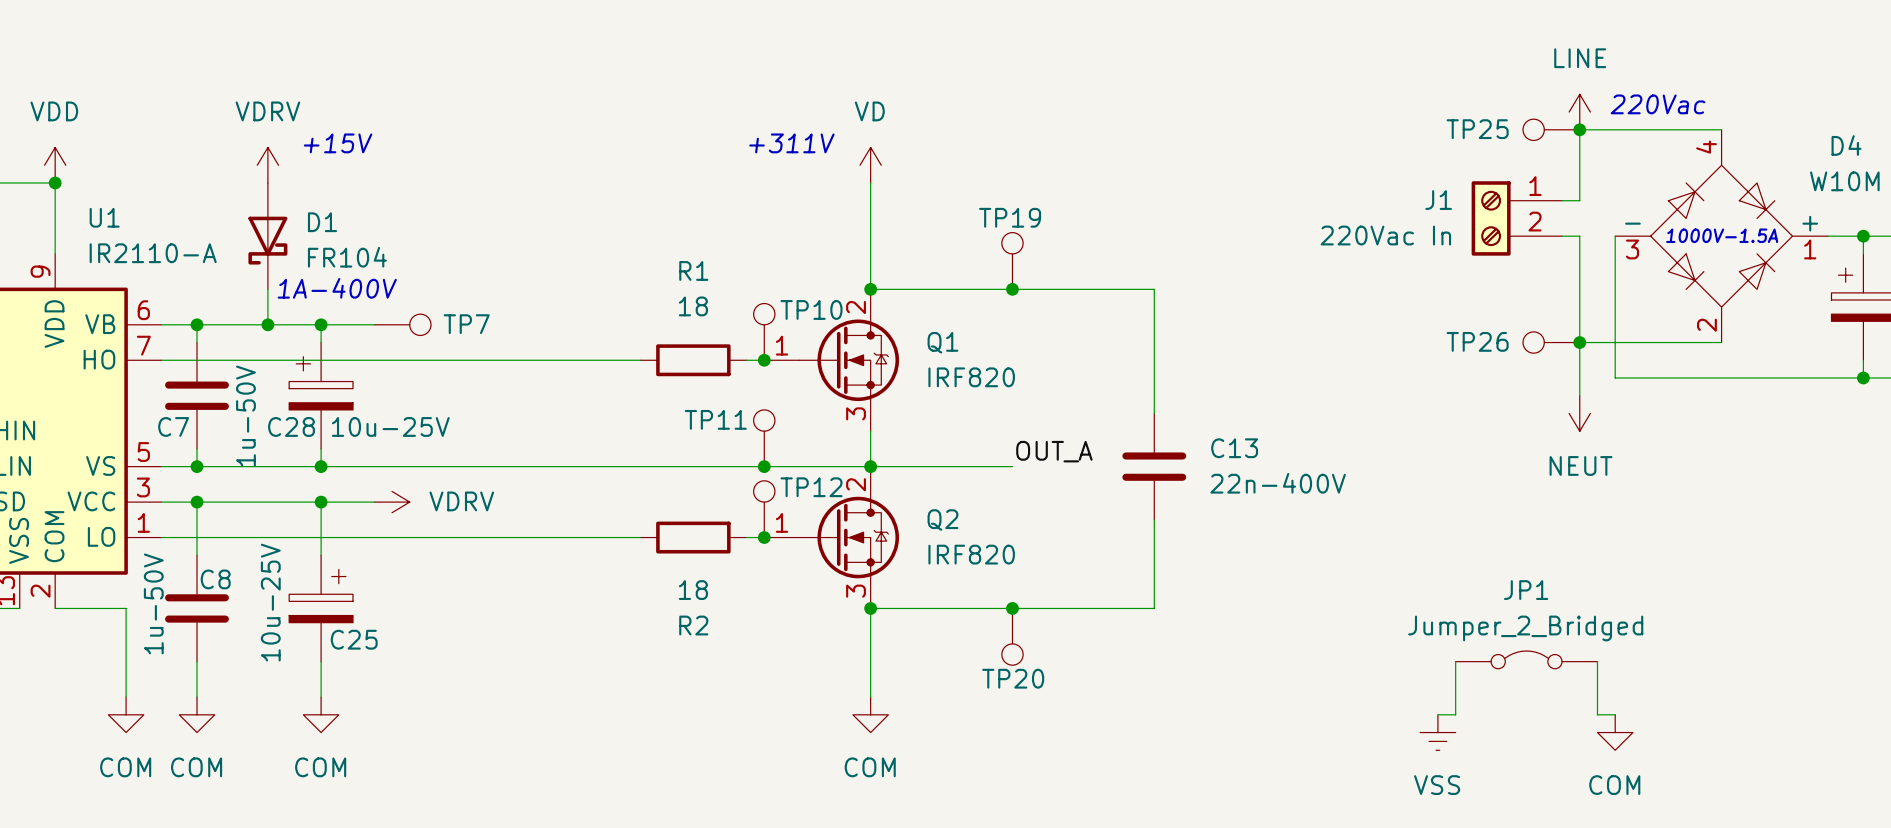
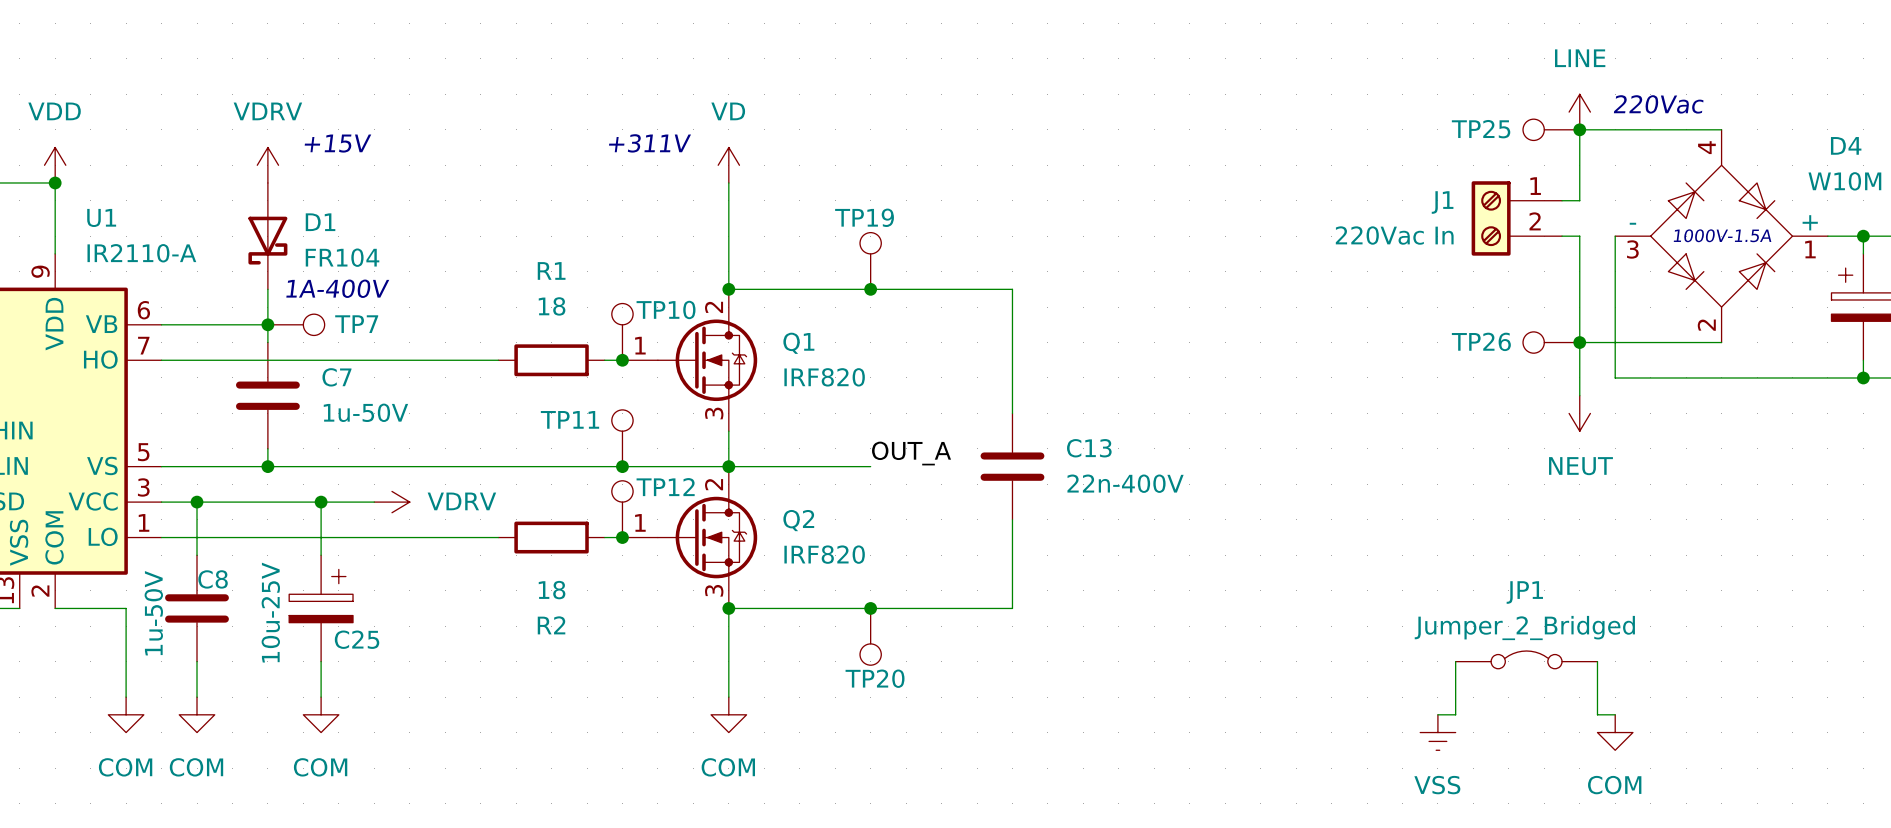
text position: +311V (791, 143) -> +311V (649, 143)
power symbol position: VD (870, 165) -> VD (728, 165)
wire: (870, 182) (870, 289) -> (728, 182) (728, 289) (870, 289)
TP19 position: (1012, 260) -> (870, 260)
junction: none -> (728, 289)
wire: (1012, 289) (1154, 289) (1154, 413) -> (1012, 289) (1012, 413)
junction: (1012, 289) -> none
wire: (197, 324) (197, 342) -> none
junction: (197, 324) -> none
wire: (267, 324) (374, 324) -> (267, 324) (267, 342)
wire: (321, 324) (321, 342) -> none
junction: (321, 324) -> none
TP7 position: (402, 324) -> (296, 324)
TP10 position: (764, 331) -> (622, 331)
wire: (498, 360) (604, 360) -> none
junction: none -> (622, 360)
R1 position: (693, 360) -> (551, 360)
wire: (746, 360) (764, 360) -> none
junction: (764, 360) -> none
Q1 position: (831, 360) -> (689, 360)
C7 position: (197, 395) -> (267, 395)
C28: 10u-25V (321, 395) -> none
C7 value rotation: 0° (245, 416) -> 90° clockwise (365, 412)
C7 name position: C7 (173, 426) -> C7 (336, 377)
wire: none -> (728, 431) (728, 466)
wire: (870, 431) (870, 466) (1012, 466) -> none
TP11 position: (764, 438) -> (622, 438)
wire: (197, 448) (197, 466) -> none
wire: (321, 448) (321, 466) -> (267, 448) (267, 466)
label position: OUT_A (1054, 451) -> OUT_A (911, 453)
junction: (197, 466) -> none
junction: none -> (267, 466)
junction: (321, 466) -> none
junction: none -> (622, 466)
junction position: (764, 466) -> (728, 466)
junction: (870, 466) -> none
C13 position: (1154, 466) -> (1012, 466)
TP12 position: (764, 509) -> (622, 509)
wire: (1154, 519) (1154, 608) (1012, 608) -> (1012, 519) (1012, 608)
wire: (498, 537) (604, 537) -> none
junction: none -> (622, 537)
R2 position: (693, 537) -> (551, 537)
wire: (746, 537) (764, 537) -> none
junction: (764, 537) -> none
Q2 position: (831, 537) -> (689, 537)
junction: none -> (728, 608)
wire: (870, 608) (870, 697) -> (870, 608) (728, 608) (728, 697)
junction: (1012, 608) -> none
TP20 position: (1012, 636) -> (870, 636)
power symbol position: COM (870, 714) -> COM (728, 714)

